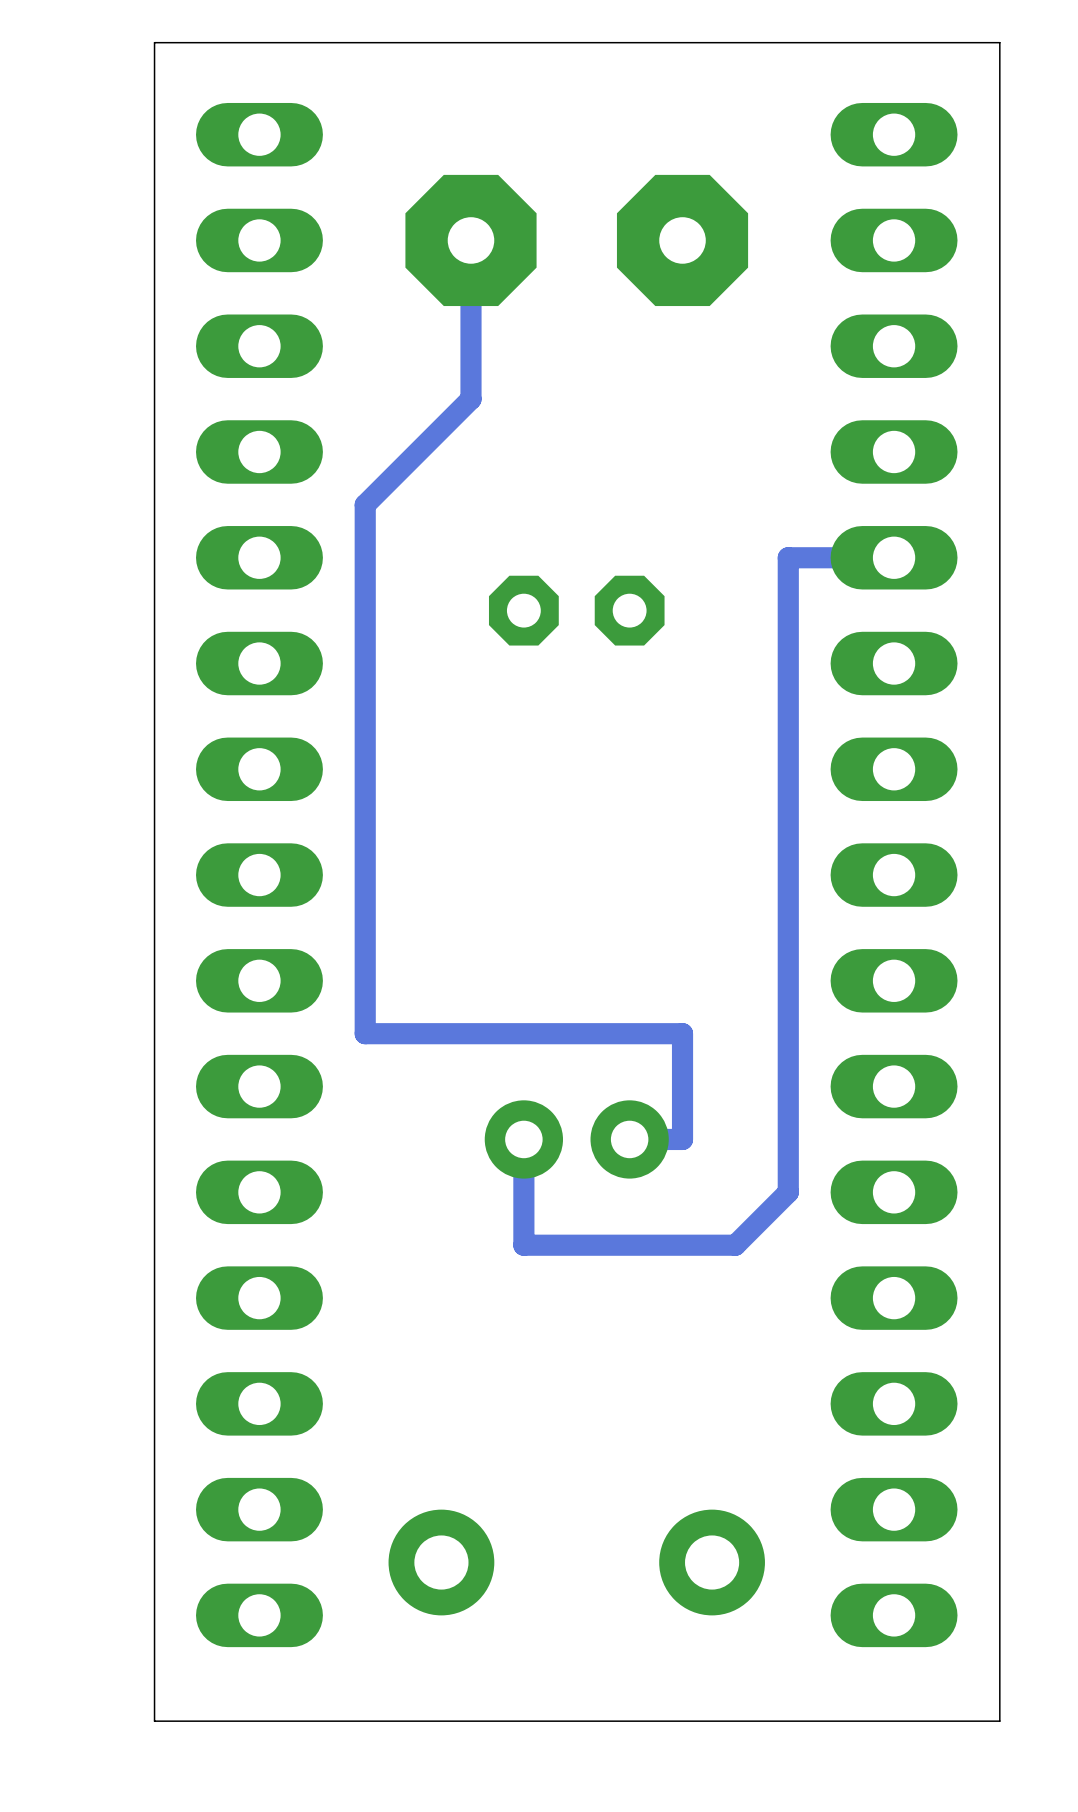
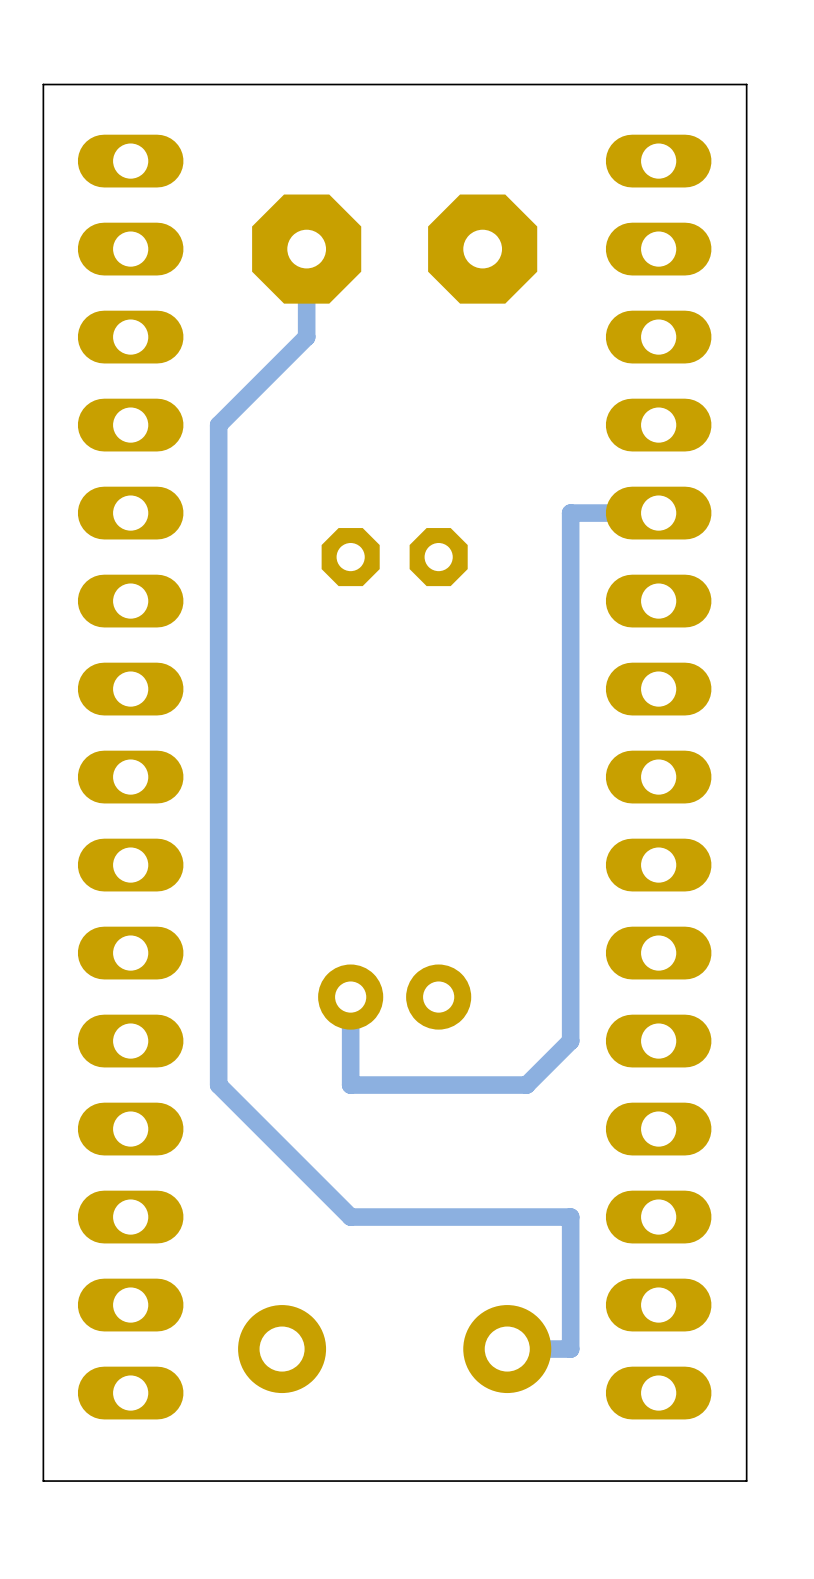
track: (470, 346) (470, 399) (365, 504) -> (306, 337) (218, 425) (218, 469)
track: (365, 1033) (682, 1033) (682, 1139) (629, 1139) -> (218, 909) (218, 1085) (350, 1217) (570, 1217) (570, 1349) (507, 1349)

